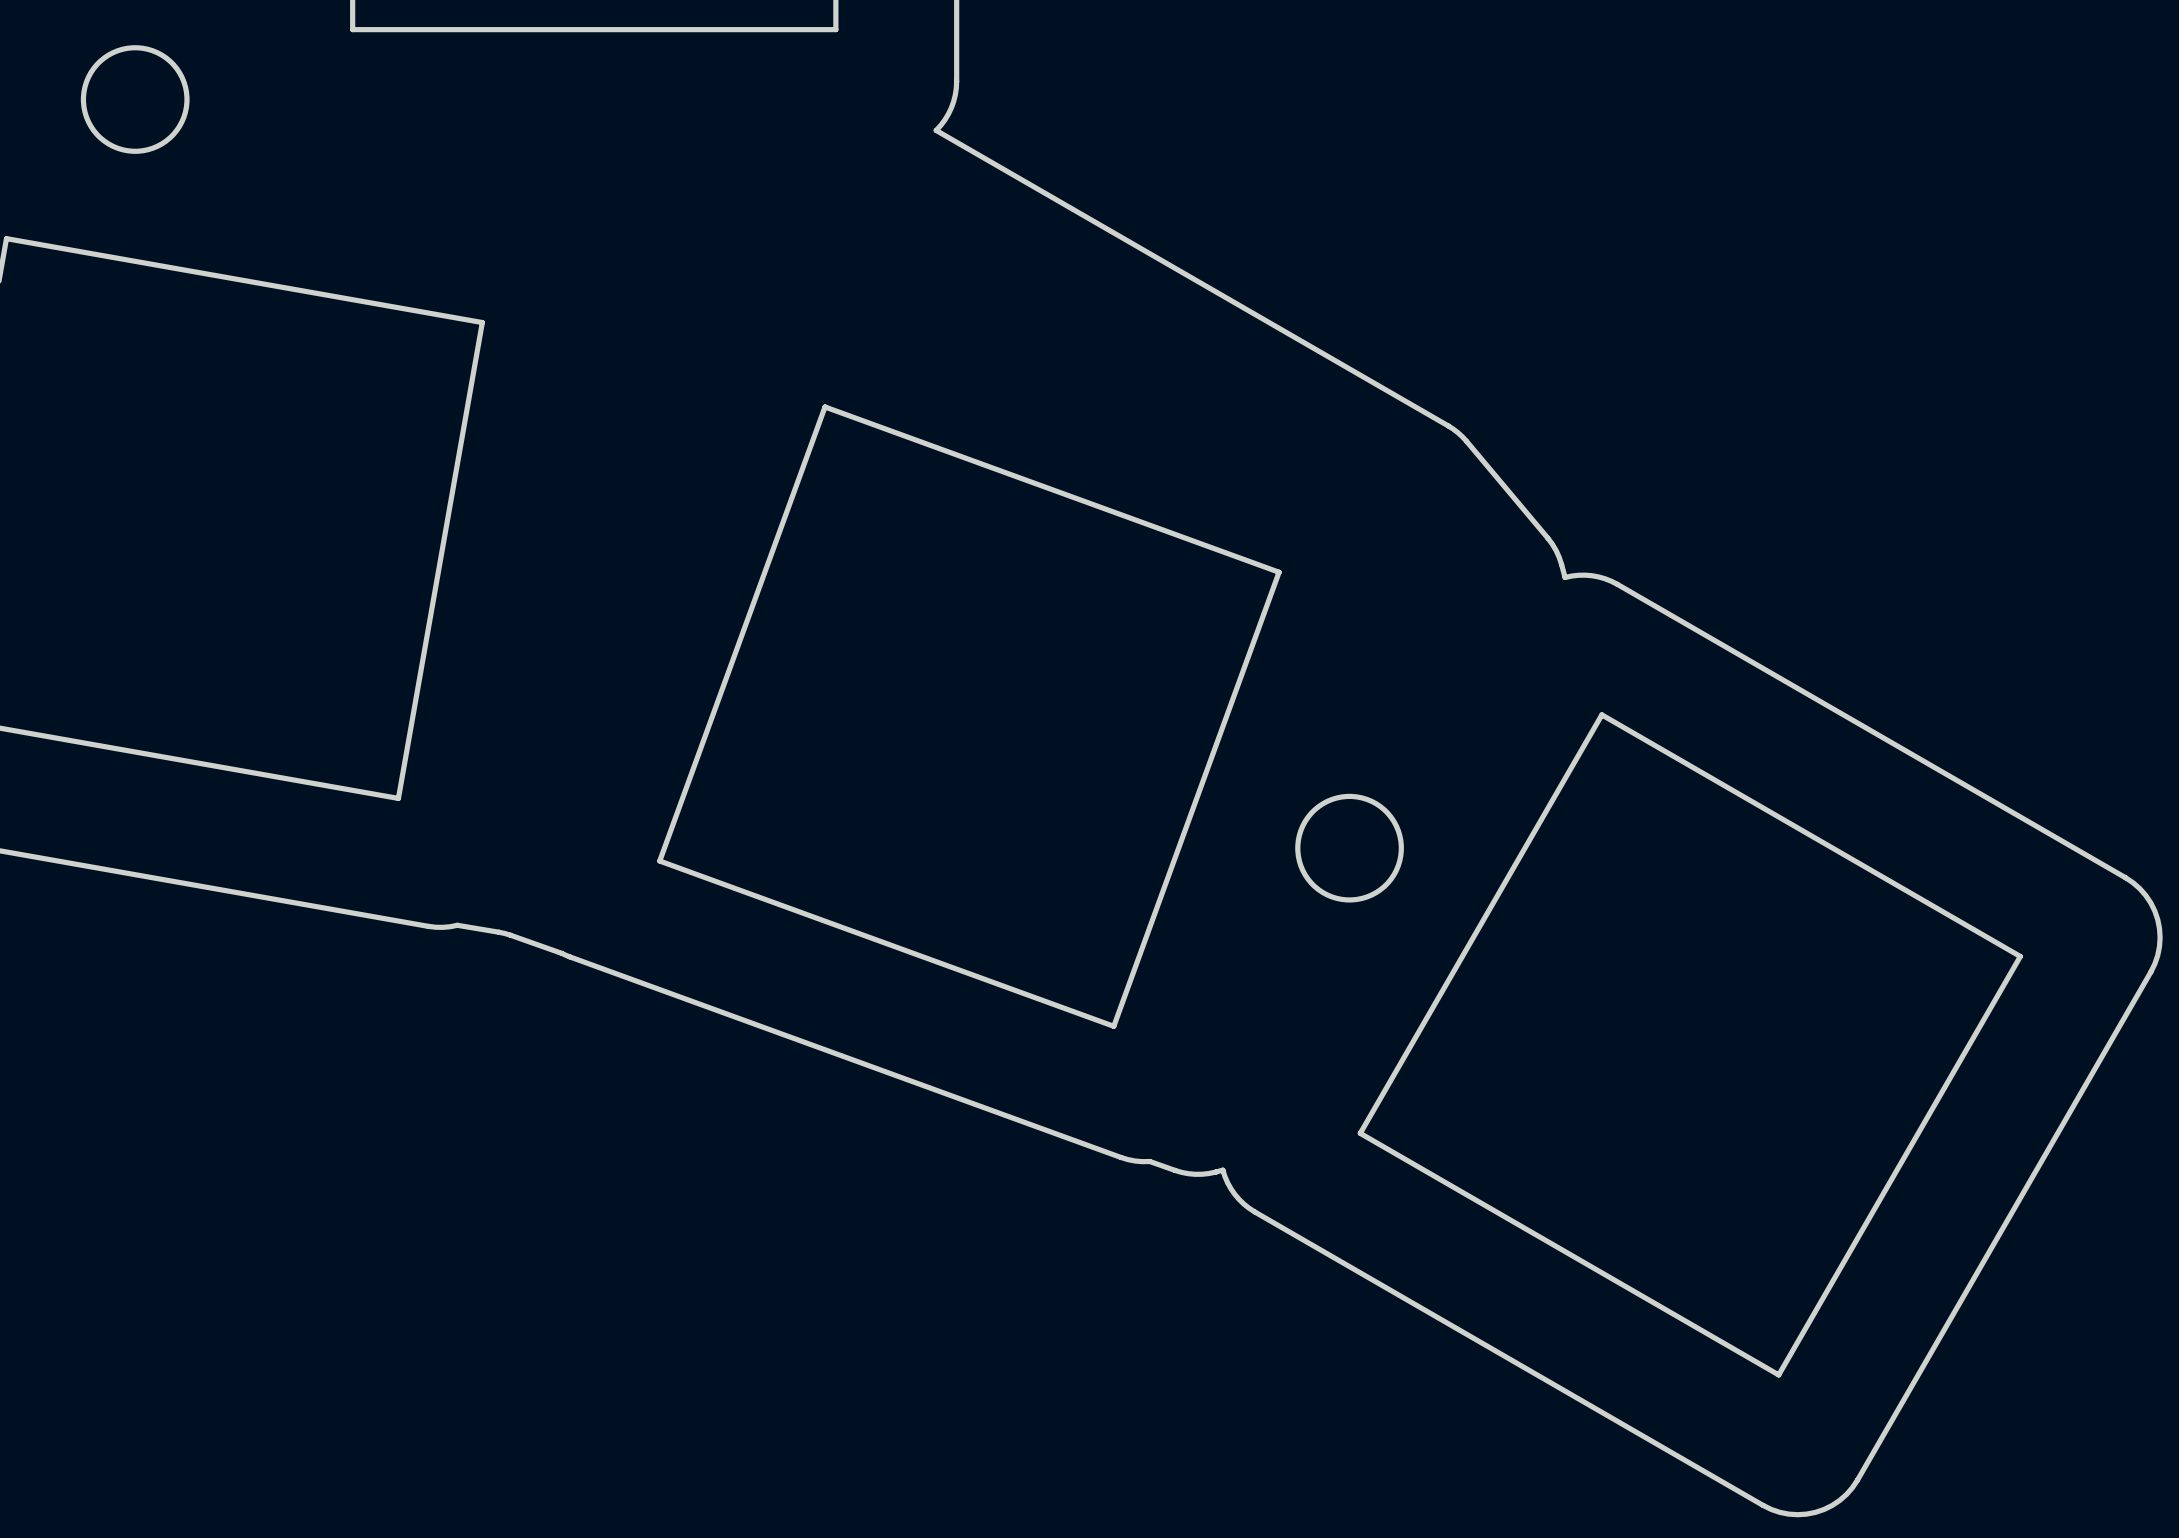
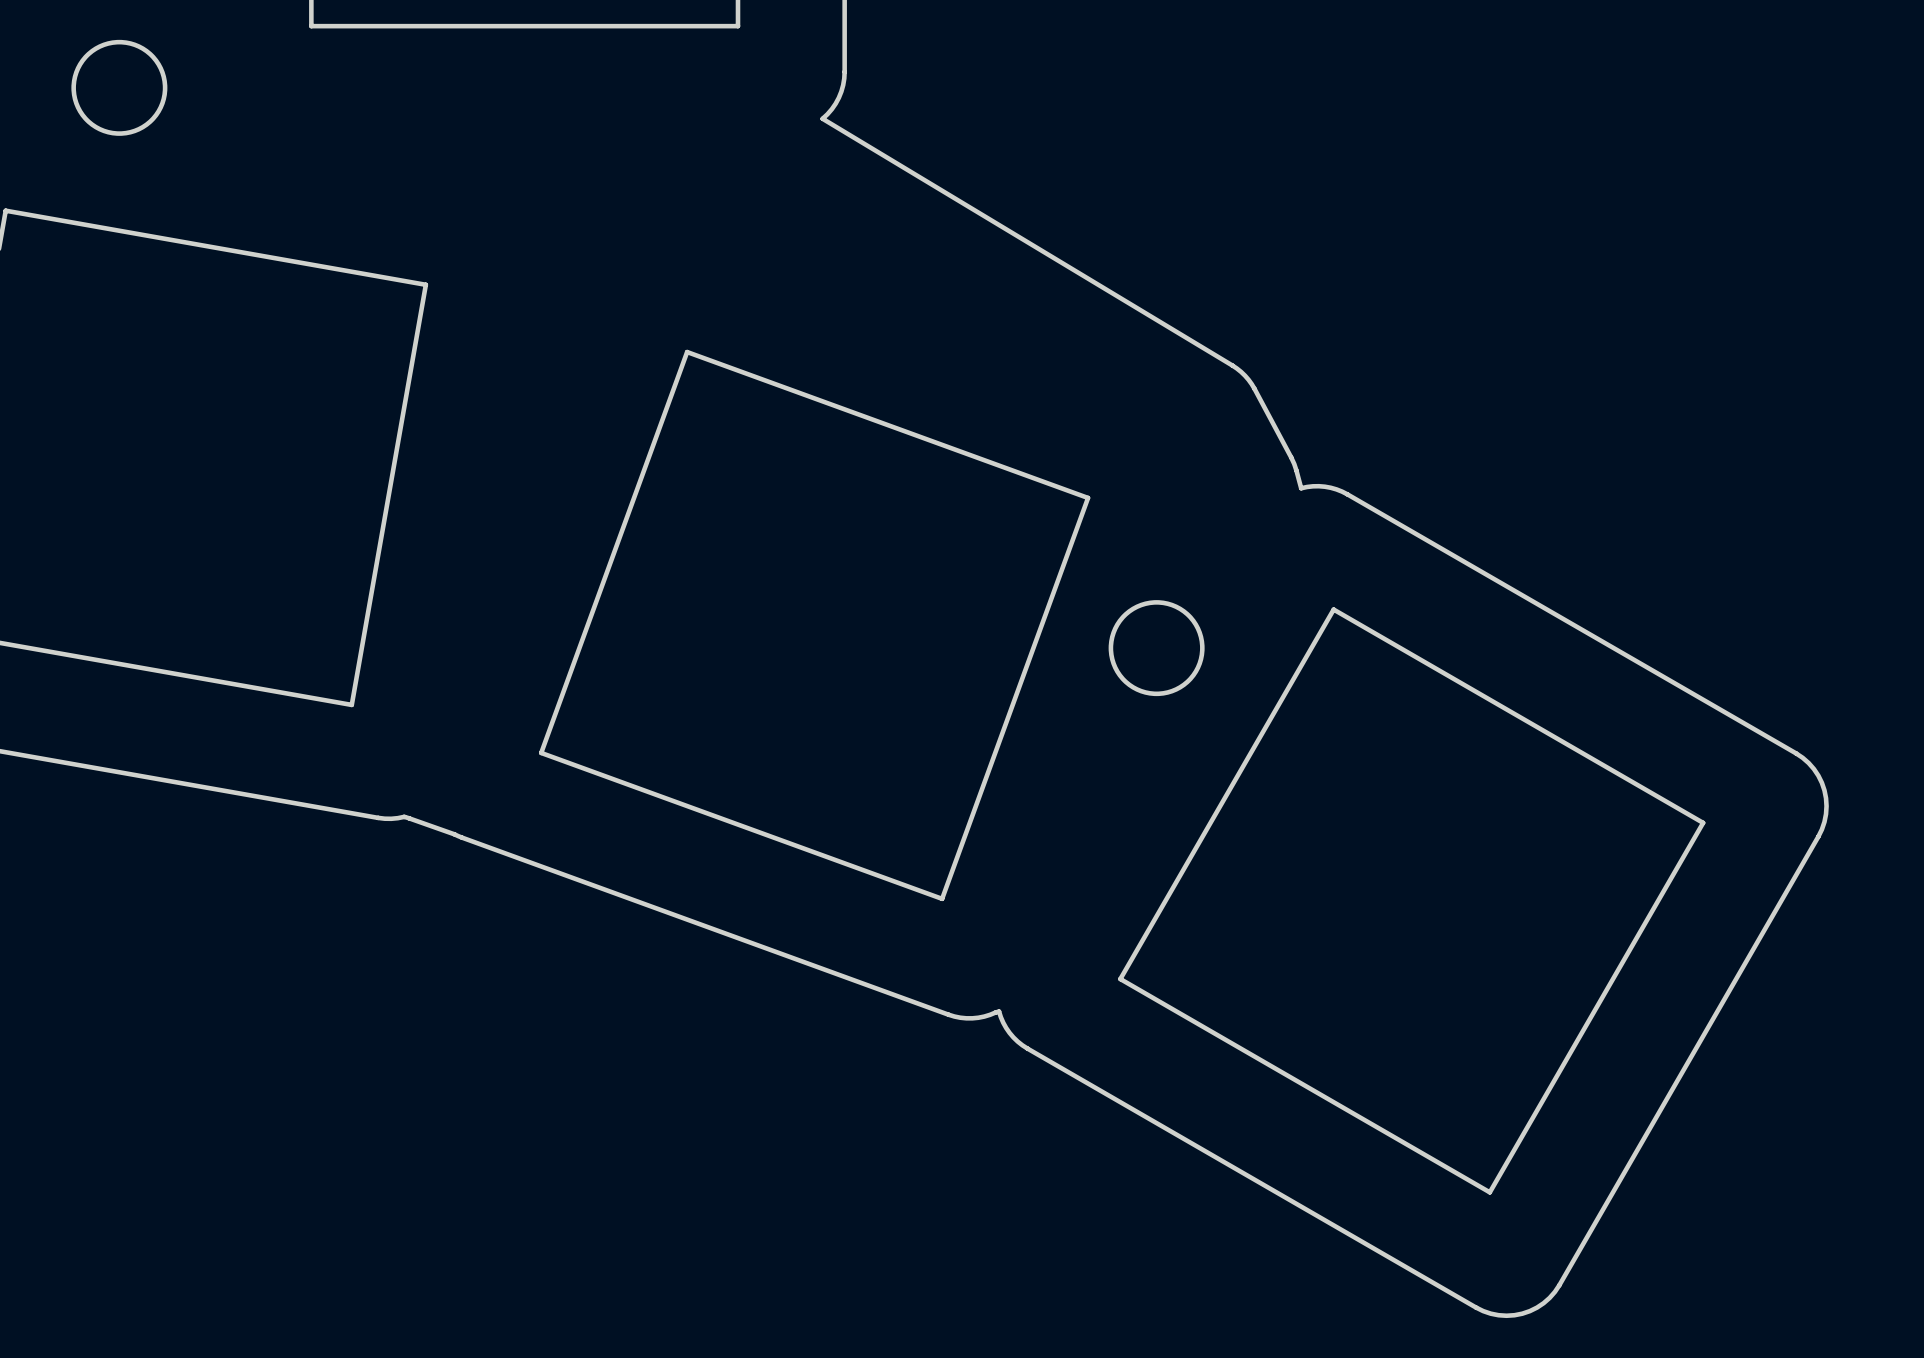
board edge: (956, 81) (951, 107) (936, 130) (1453, 429) (1466, 441) (1547, 538) (1559, 557) (1565, 577) (1591, 575) (1617, 584) (2125, 877) (2139, 888) (2150, 903) (2157, 919) (2160, 937) (2157, 955) (2150, 972) (1857, 1480) (1846, 1494) (1824, 1509) (1797, 1514) (1771, 1509) (1255, 1212) (1234, 1194) (1222, 1170) (1202, 1174) (1188, 1173) (1149, 1161) (1135, 1161) (1121, 1157) (510, 935) (457, 925) (442, 927) (428, 926) -> (844, 71) (838, 97) (822, 118) (1236, 368) (1254, 388) (1291, 457) (1301, 488) (1324, 486) (1347, 494) (1796, 753) (1808, 763) (1818, 775) (1824, 790) (1826, 806) (1824, 821) (1818, 836) (1559, 1285) (1549, 1297) (1529, 1311) (1506, 1315) (1483, 1311) (1027, 1048) (1009, 1032) (999, 1011) (972, 1018) (948, 1014) (409, 818) (404, 816) (378, 817)
board edge: (825, 406) (1279, 572) (1113, 1026) (659, 861) (825, 406) -> (687, 352) (1088, 497) (942, 898) (541, 752) (687, 352)
board edge: (1601, 714) (2020, 956) (1778, 1374) (1360, 1133) (1601, 714) -> (1333, 609) (1703, 822) (1489, 1192) (1120, 979) (1333, 609)
round board edge position: (1349, 848) -> (1156, 648)

